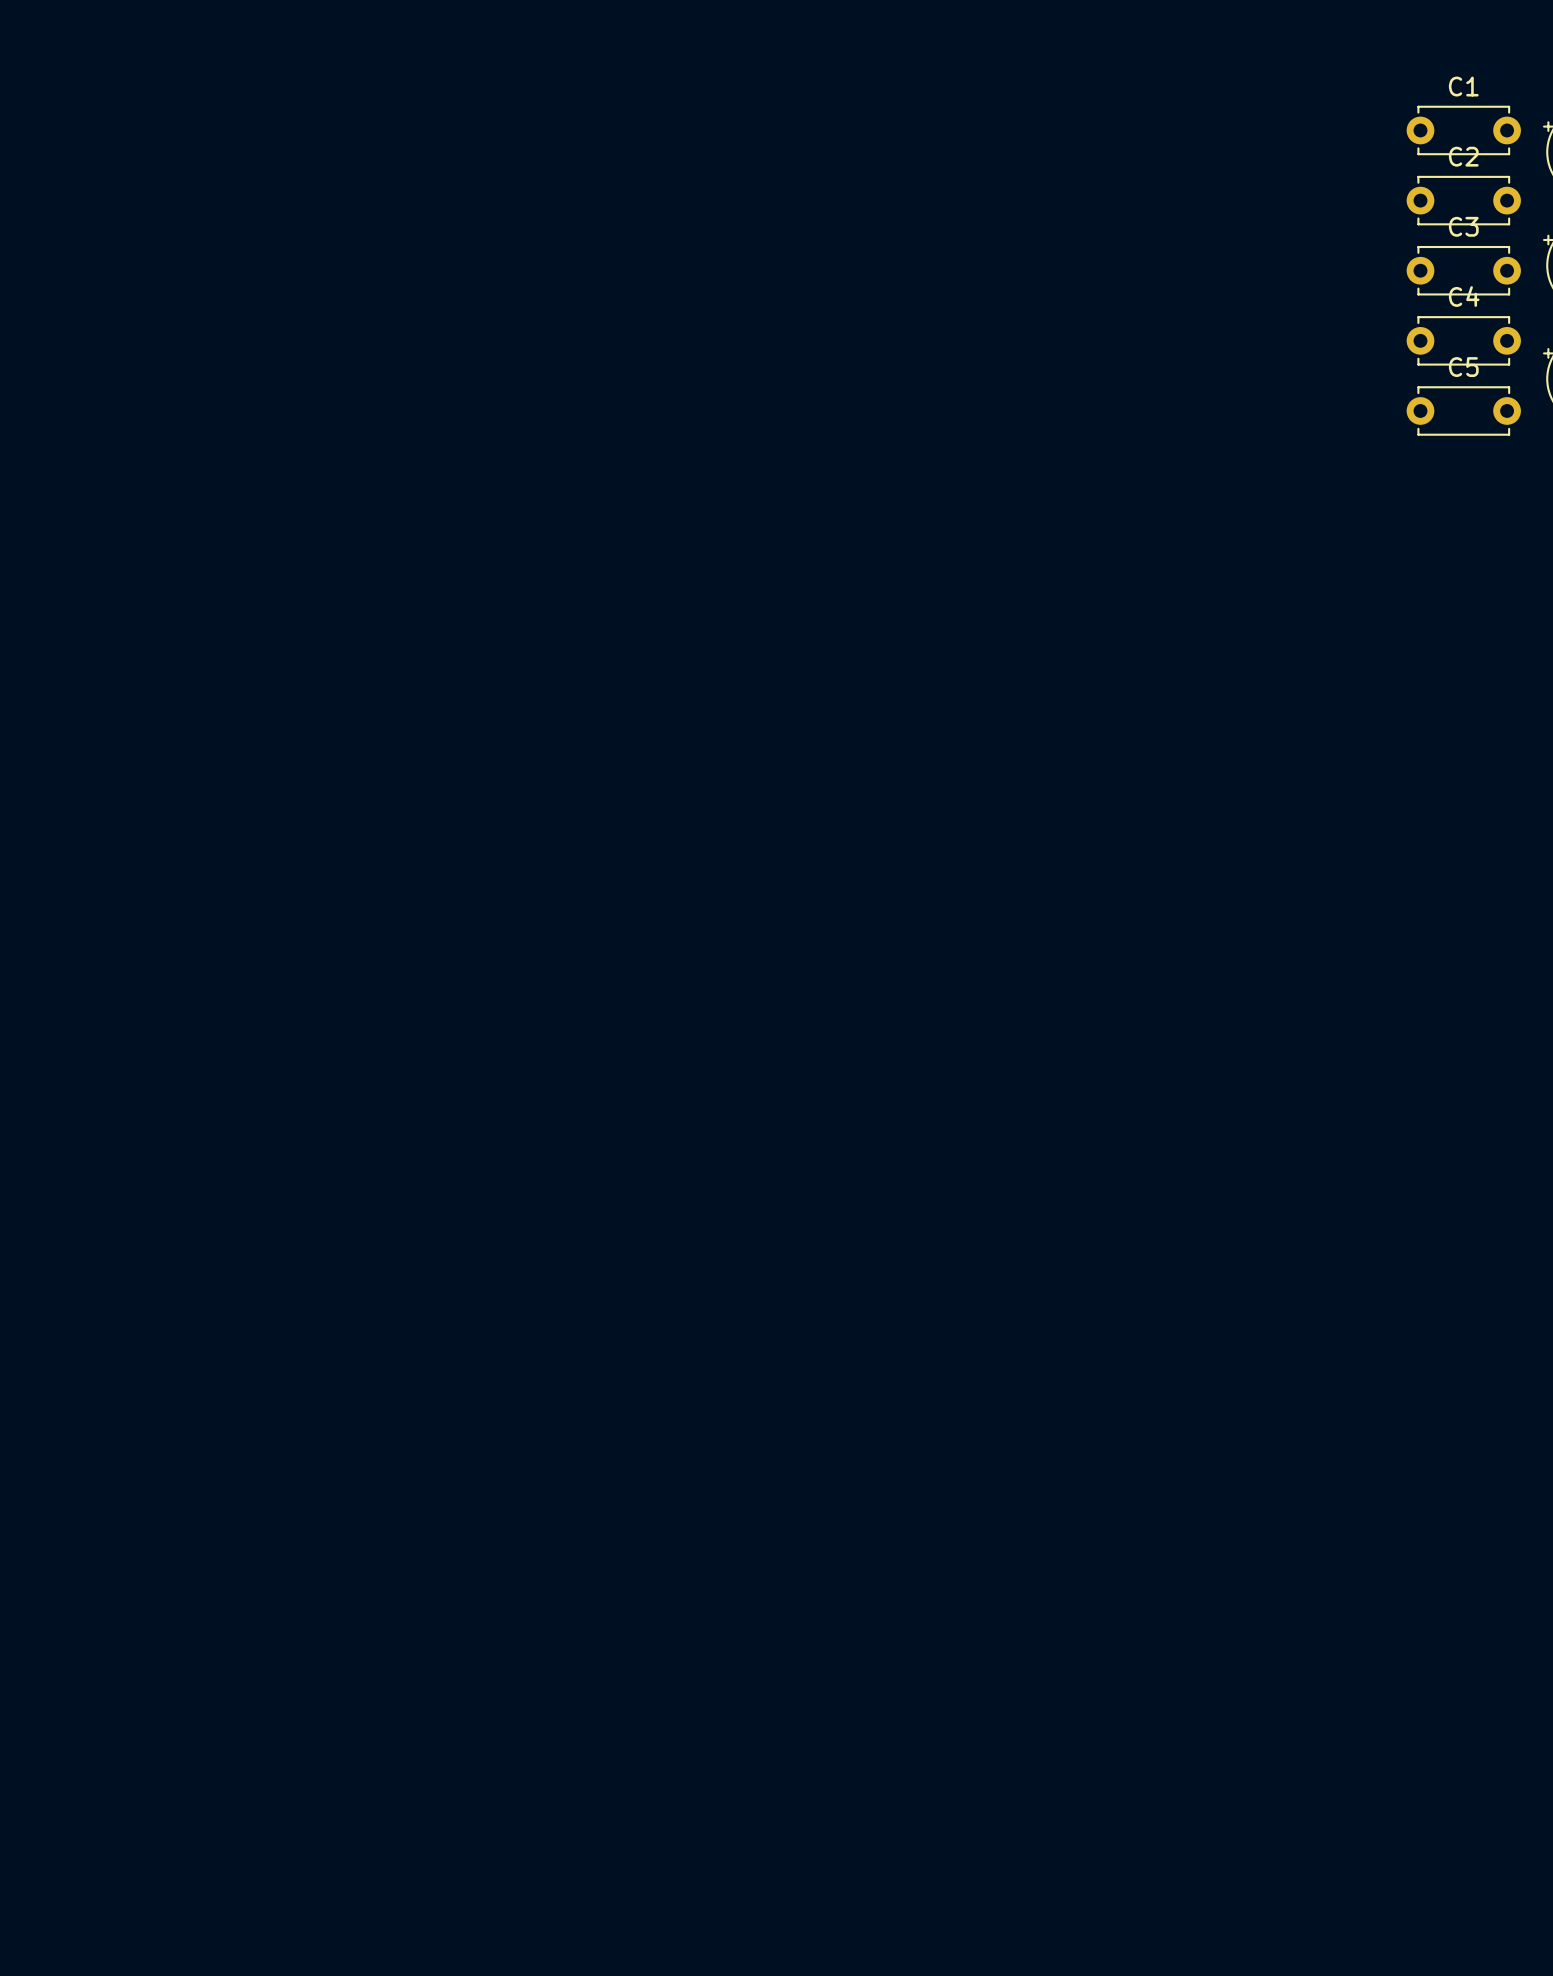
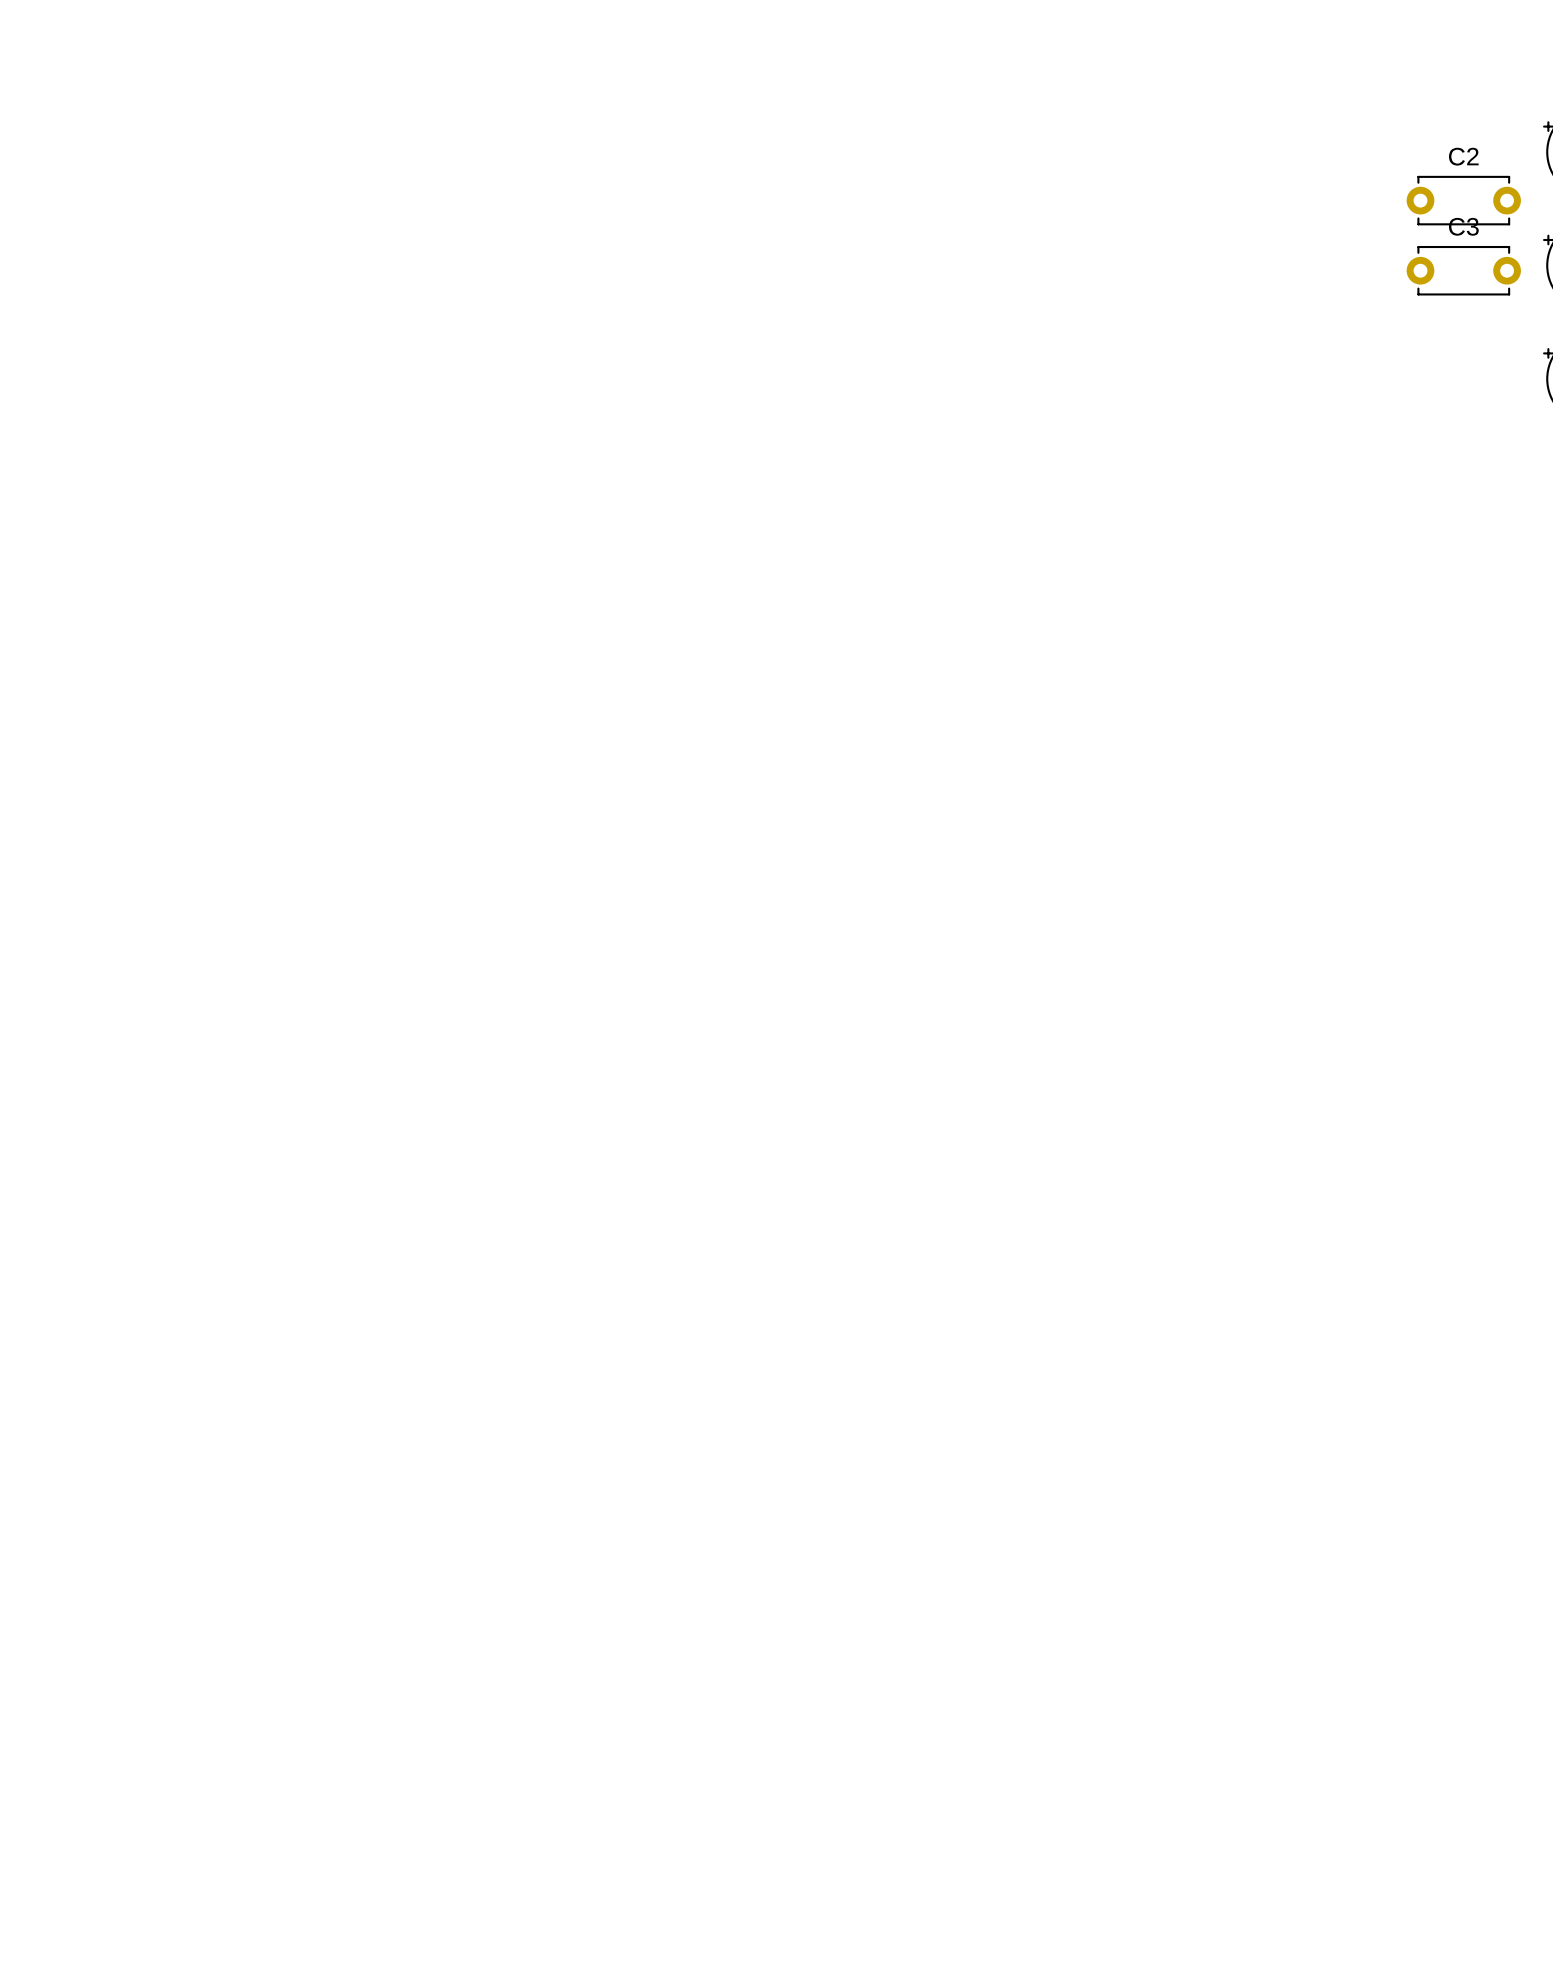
C1: (1463, 130) -> none
C4: (1463, 340) -> none
C5: (1463, 410) -> none

